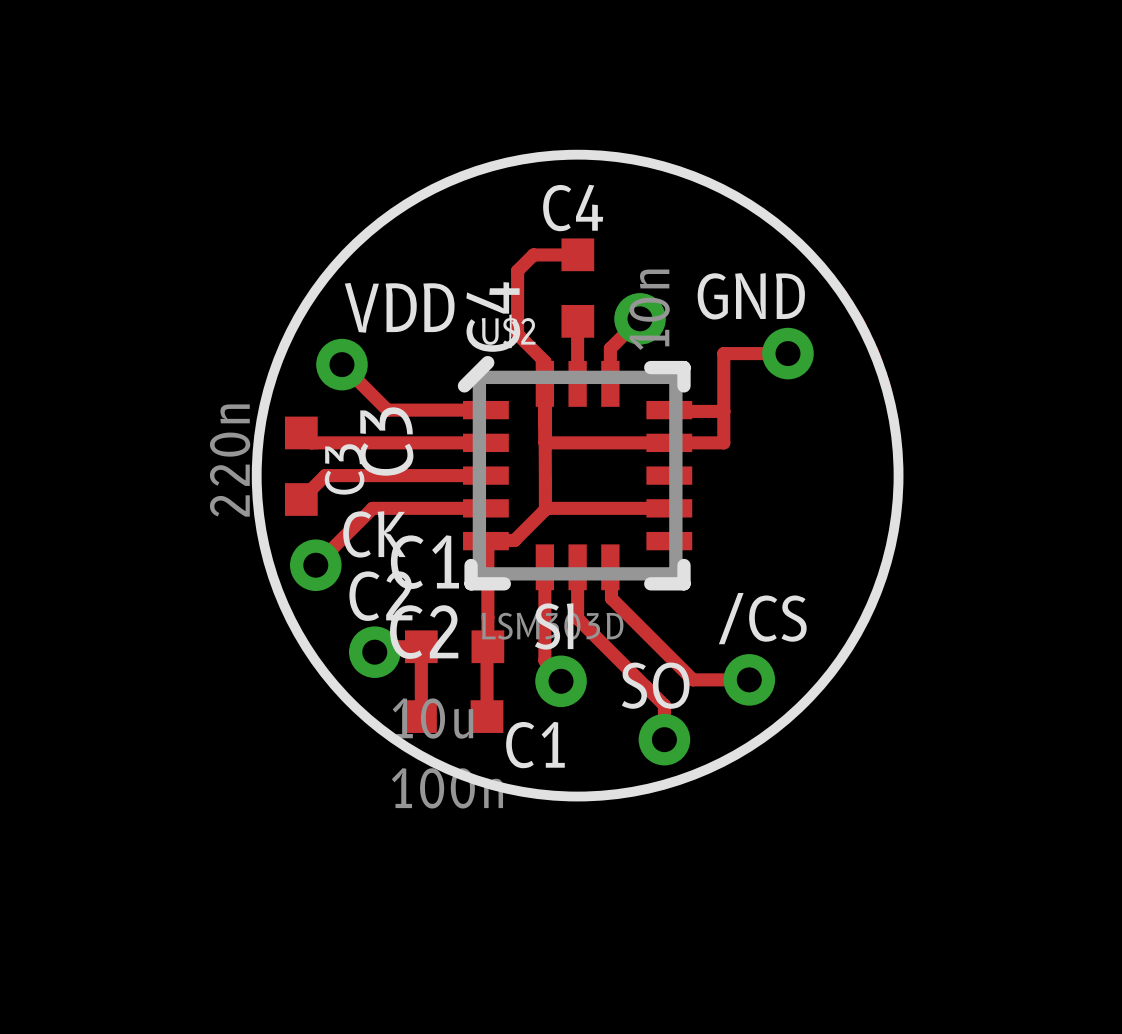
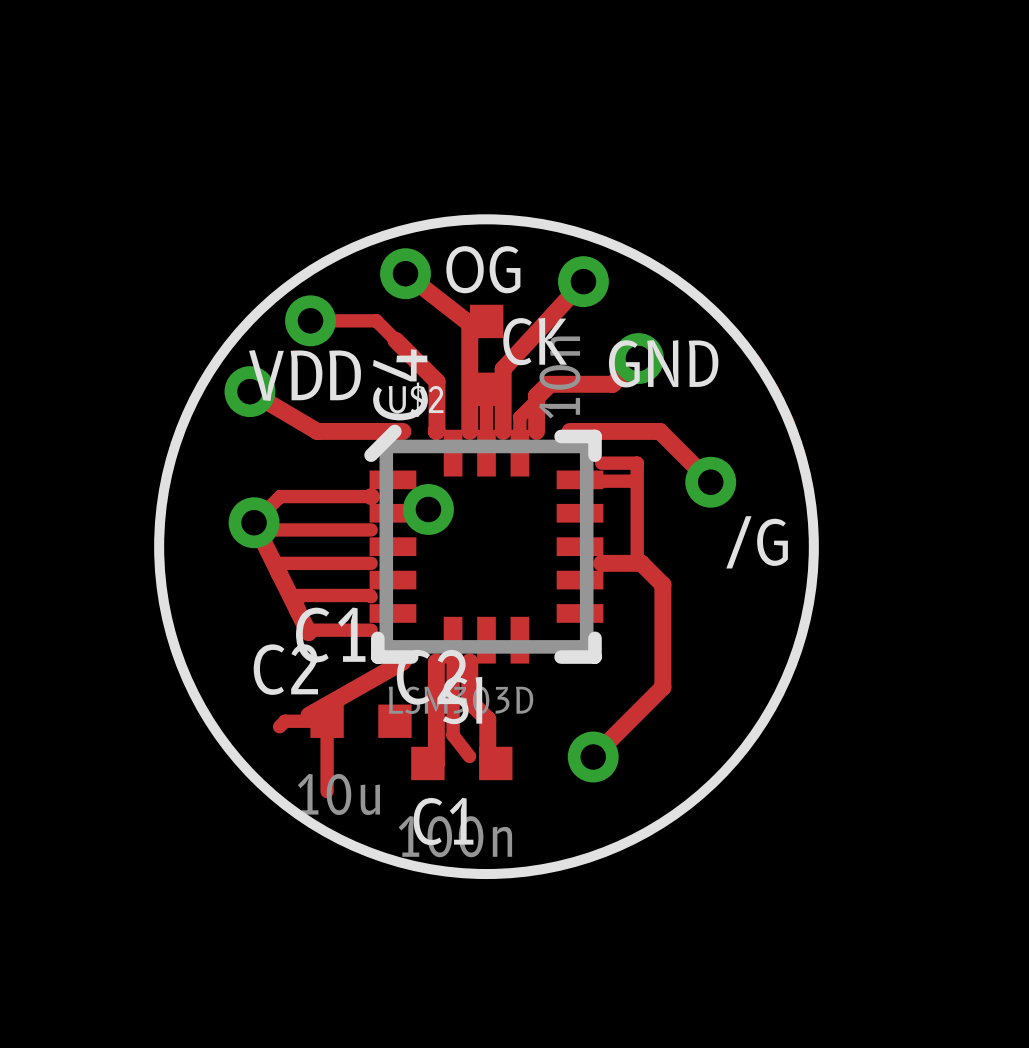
track: none -> (405, 273) (469, 323) (469, 431)
via: none -> (405, 273)
text: C4 (573, 208) -> OG (483, 269)
track: none -> (583, 281) (503, 369) (503, 431)
via: none -> (583, 281)
track: none -> (310, 320) (376, 320) (436, 381) (436, 430)
via: none -> (310, 320)
track: (577, 254) (533, 254) (517, 270) (517, 334) (544, 361) (545, 442) (723, 442) (723, 353) (787, 353) -> none
track: none -> (638, 358) (612, 384) (547, 384) (536, 395) (536, 431)
via: none -> (638, 358)
via: (640, 318) -> none
track: none -> (249, 391) (317, 431) (402, 431)
via: (787, 353) -> none
track: none -> (569, 431) (659, 431) (710, 482)
track: (341, 364) (387, 410) (485, 410) -> none
via position: (341, 364) -> (249, 391)
track: (544, 383) (545, 509) -> none
track: none -> (601, 463) (637, 463) (637, 563) (601, 563) (641, 563) (662, 584) (662, 687) (593, 757)
via: none -> (710, 482)
track: none -> (371, 496) (280, 496) (254, 522)
track: (301, 432) (311, 442) (485, 442) -> none
via: none -> (428, 509)
track: none -> (254, 522) (308, 632) (308, 630) (371, 630)
track: none -> (254, 522) (254, 529) (371, 529)
via: none -> (254, 522)
C3: 220n (301, 466) -> none
text: C3 (344, 469) -> none
text: none -> /G (757, 542)
track: (485, 475) (325, 475) (301, 499) -> none
track: none -> (371, 563) (279, 563) (279, 572)
track: (485, 508) (372, 508) (315, 565) -> none
track: (669, 508) (546, 508) (514, 540) (485, 540) -> none
track: none -> (371, 596) (297, 595) (297, 610)
text position: CK (374, 534) -> CK (535, 341)
track: (484, 542) (486, 541) (487, 543) (487, 646) (485, 644) -> none
via: (315, 565) -> none
track: (577, 567) (577, 618) (664, 705) (664, 739) -> none
track: (610, 567) (611, 598) (692, 679) (749, 679) -> none
track: none -> (402, 661) (309, 715)
track: none -> (436, 661) (436, 763) (427, 763)
track: none -> (469, 661) (469, 701) (487, 719) (487, 763) (495, 763)
text: /CS (762, 618) -> none
track: (487, 647) (487, 716) -> none
via: (374, 652) -> none
via: (749, 679) -> none
via: (561, 681) -> none
via: none -> (593, 757)
text: SO (655, 685) -> none
C2 position: (453, 716) -> (461, 763)
via: (664, 739) -> none

